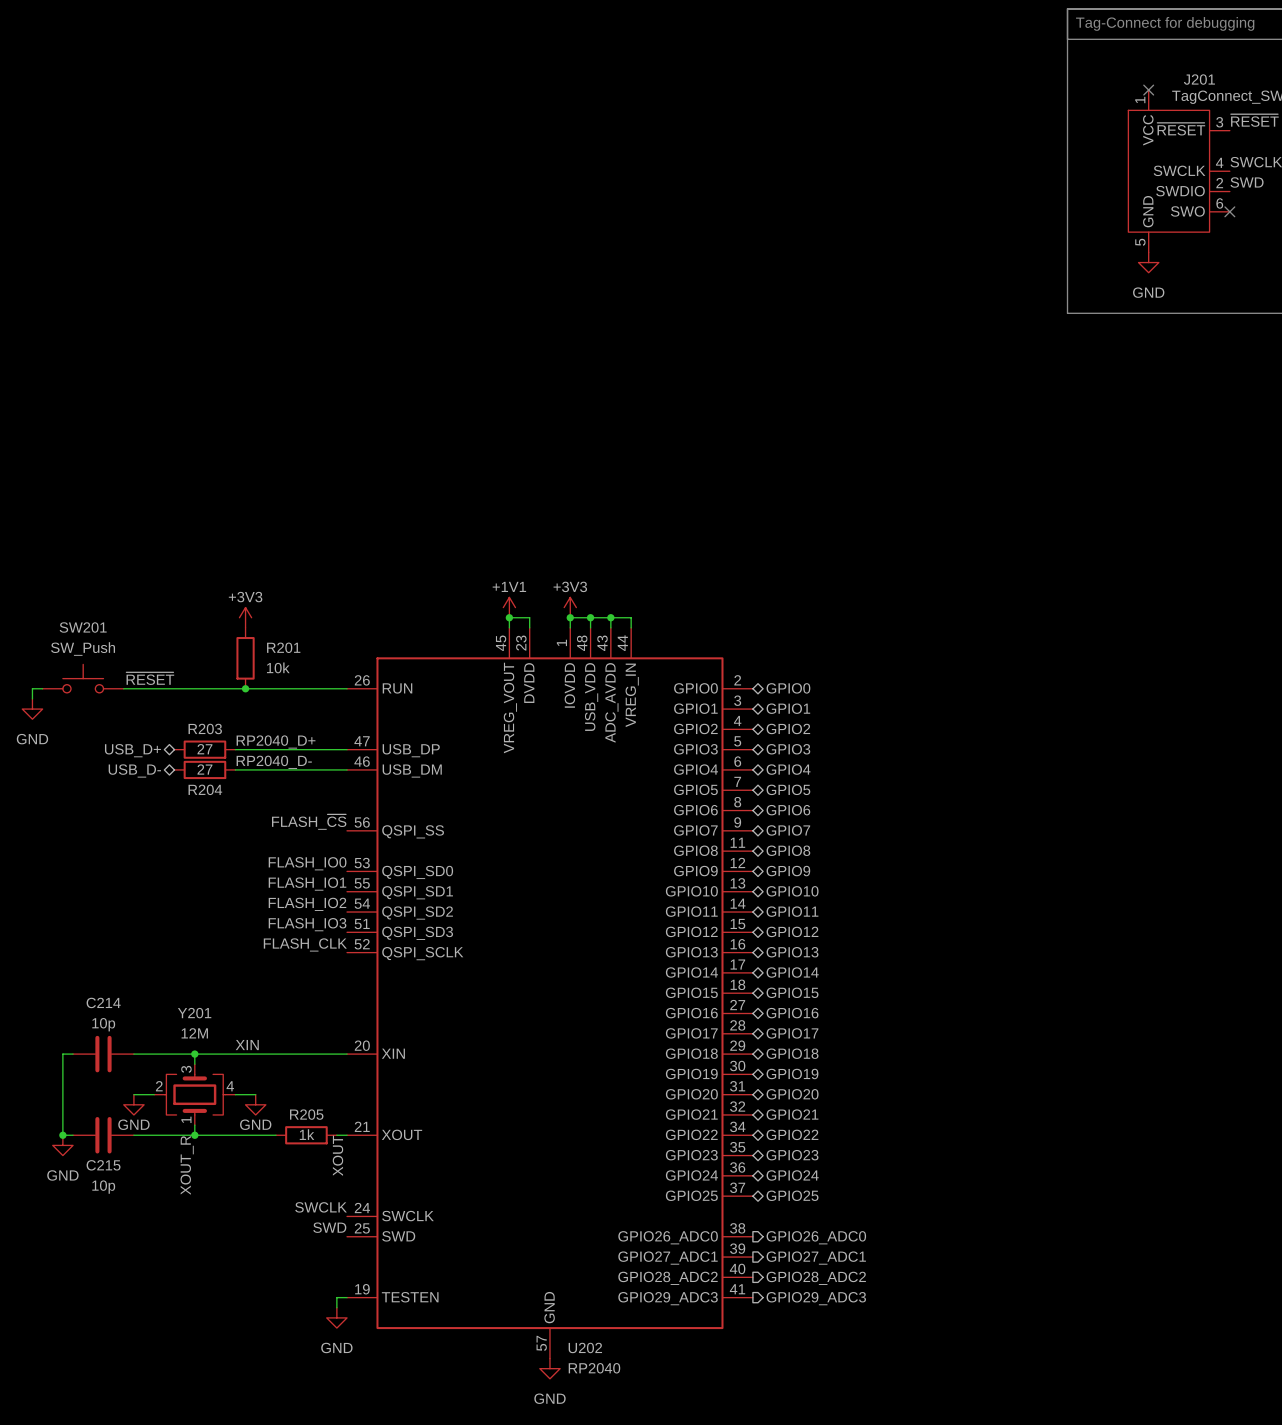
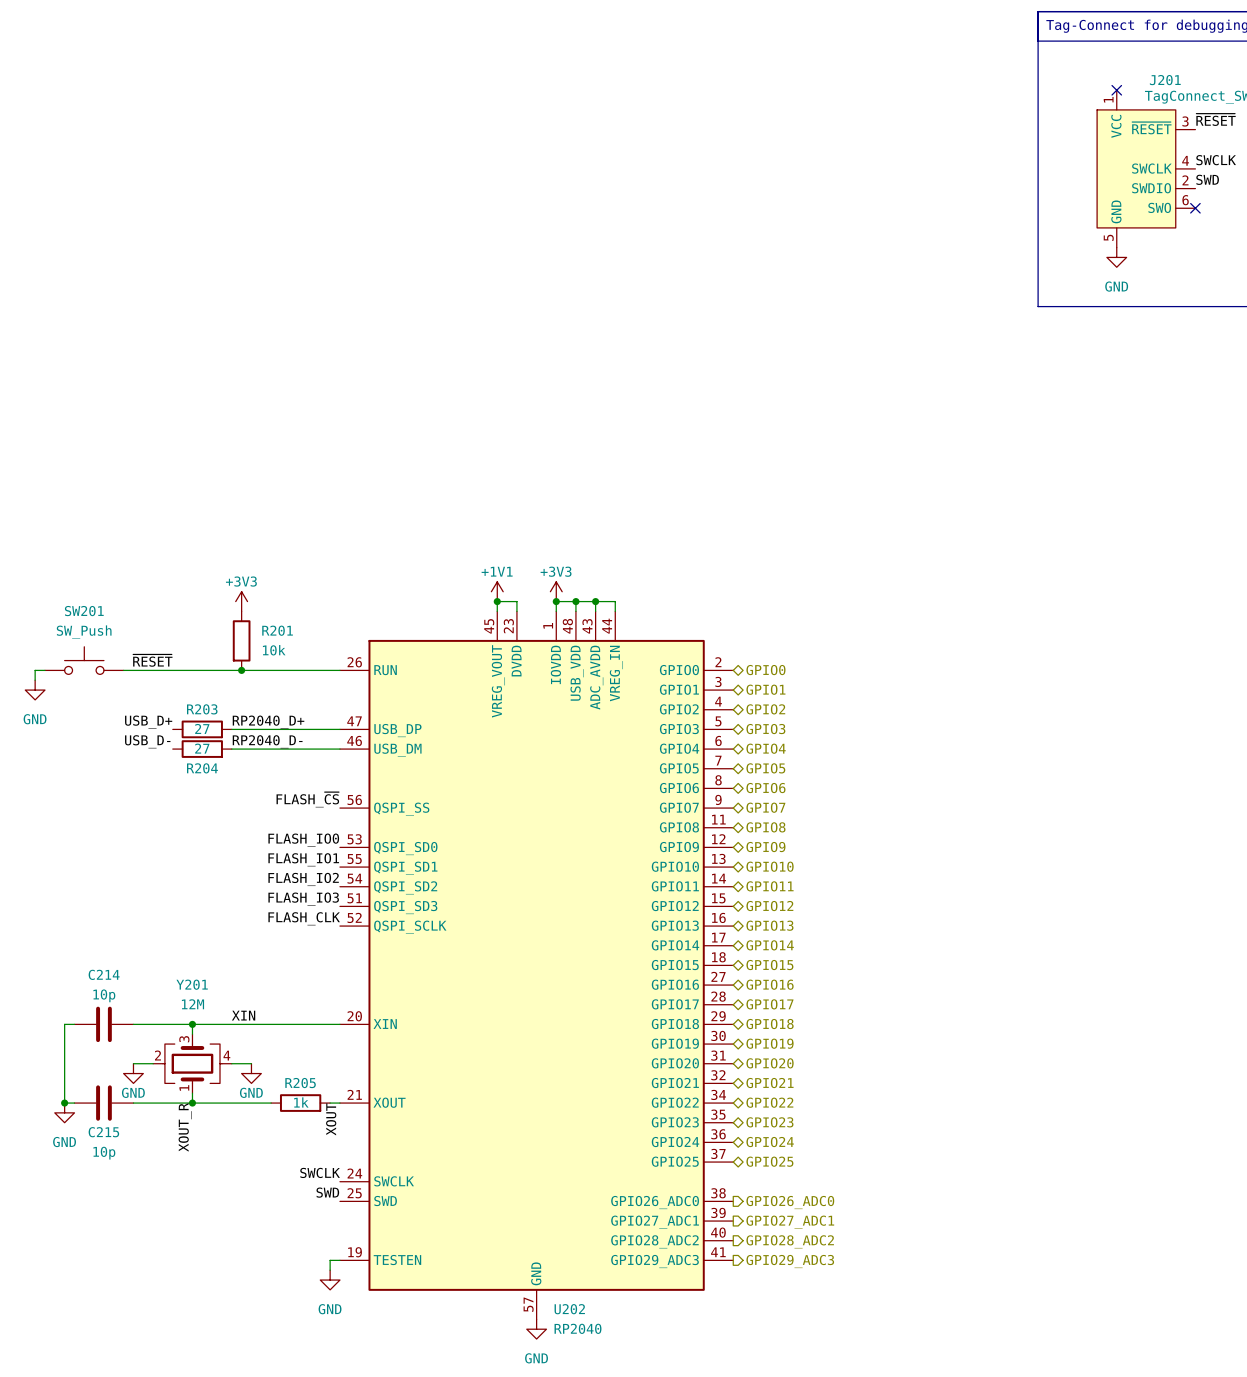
label: none -> USB_D+ (148, 722)
hierarchical label: USB_D+ (132, 750) -> none
label: none -> USB_D- (147, 741)
hierarchical label: USB_D- (134, 770) -> none

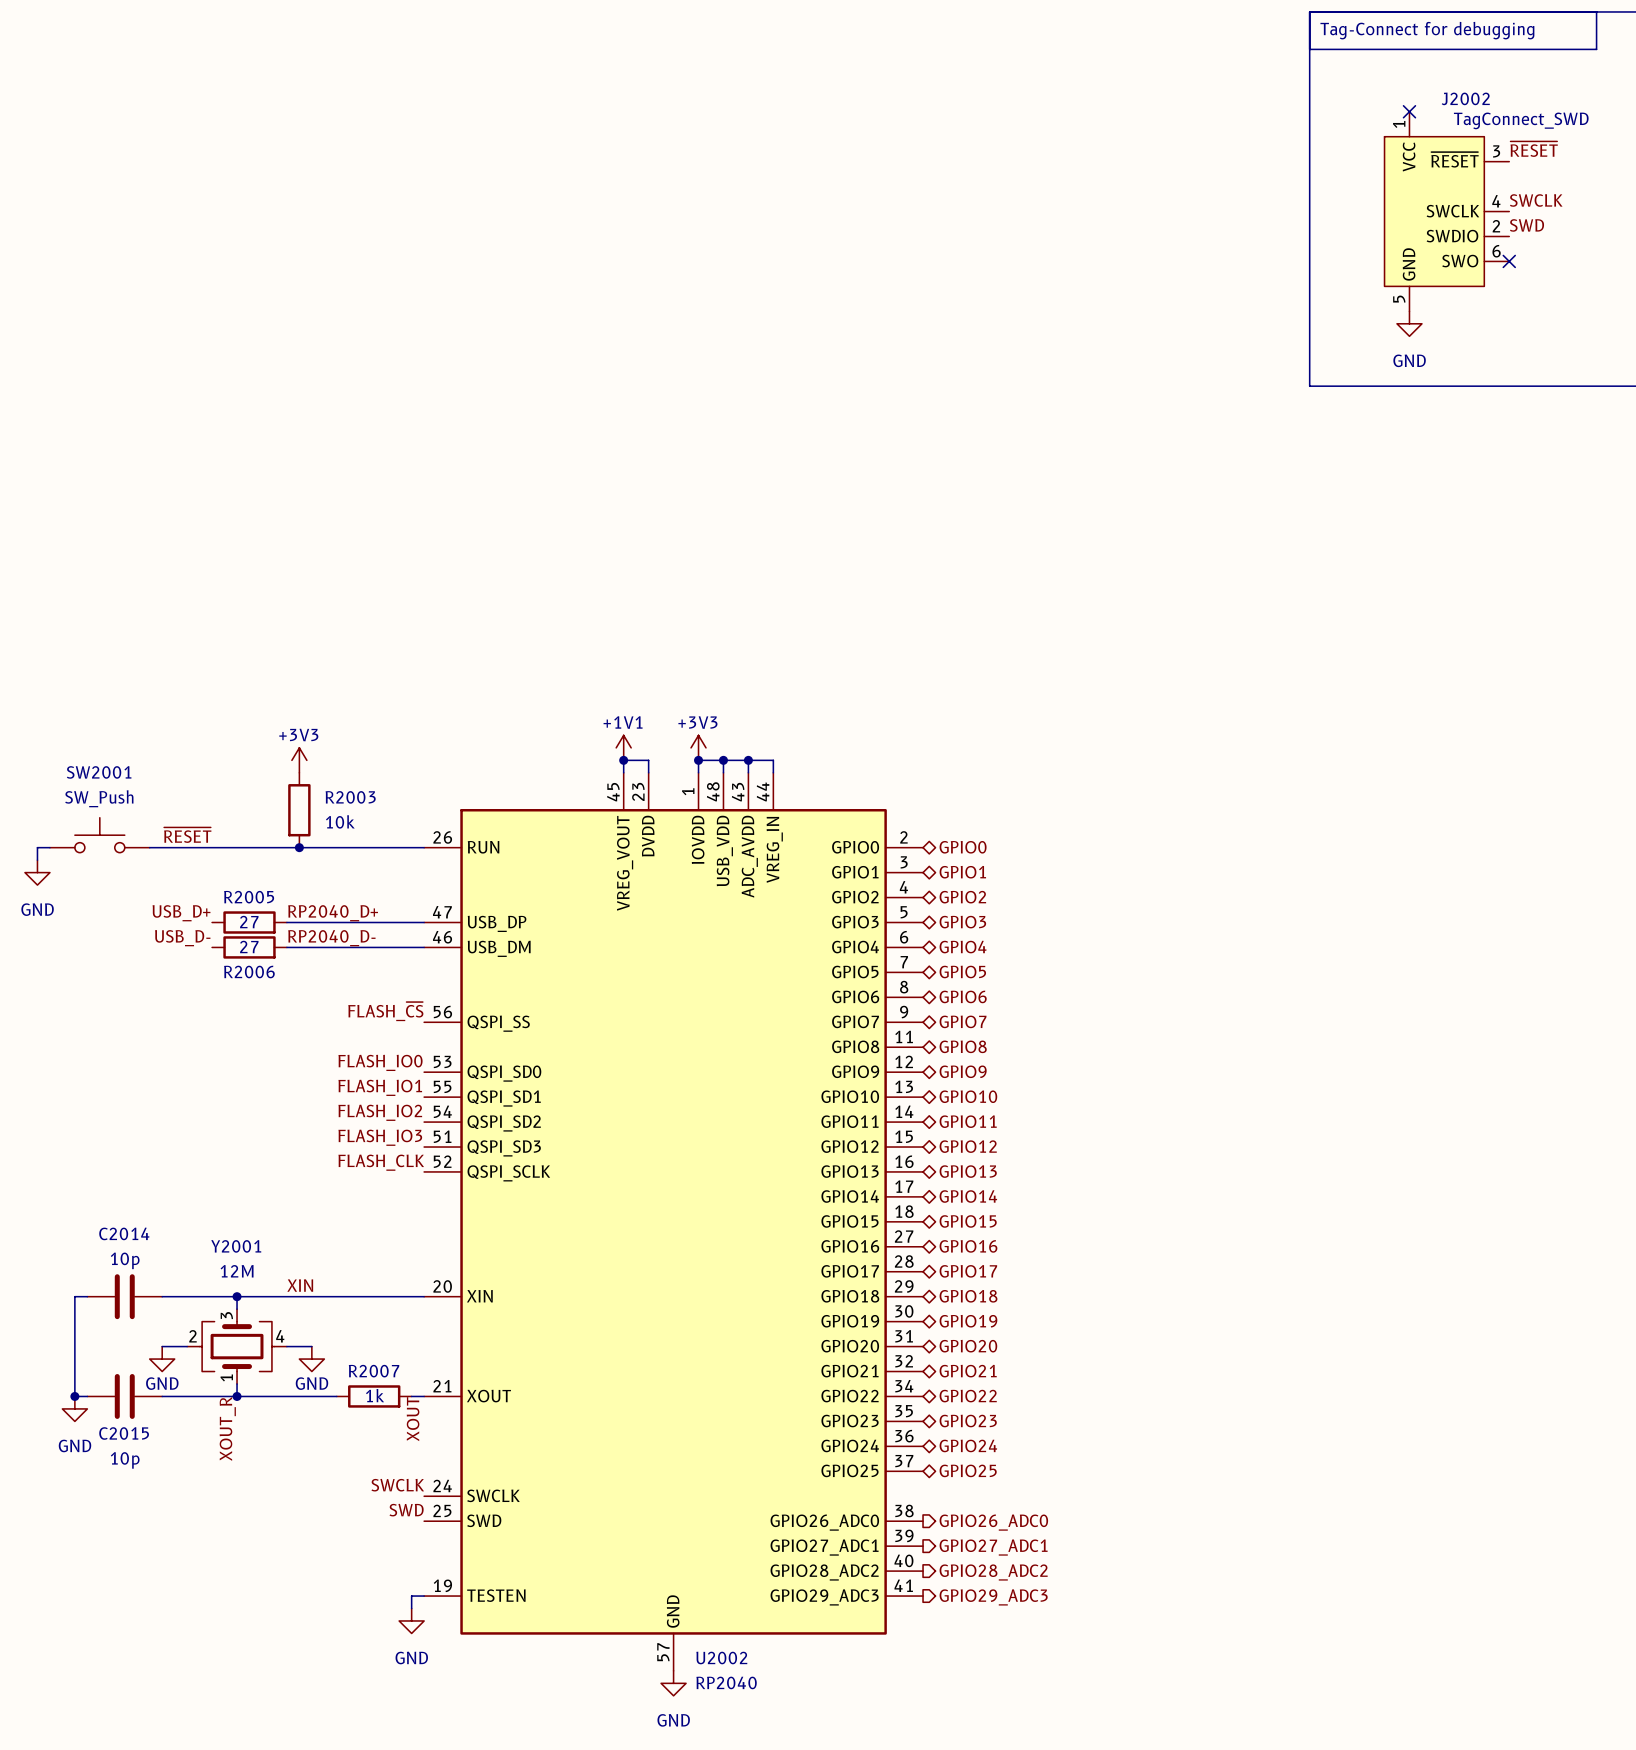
J201 name: J201 (1165, 80) -> J2002 (1465, 98)
SW201 name: SW201 (84, 611) -> SW2001 (99, 772)
R201 name: R201 (277, 630) -> R2003 (350, 797)
R203 name: R203 (202, 709) -> R2005 (249, 897)
R204 name: R204 (202, 768) -> R2006 (249, 972)
C214 name: C214 (104, 974) -> C2014 (124, 1233)
Y201 name: Y201 (192, 984) -> Y2001 (236, 1246)
R205 name: R205 (300, 1083) -> R2007 (374, 1371)
C215 name: C215 (103, 1132) -> C2015 (124, 1433)
U202 name: U202 (569, 1309) -> U2002 (721, 1658)

